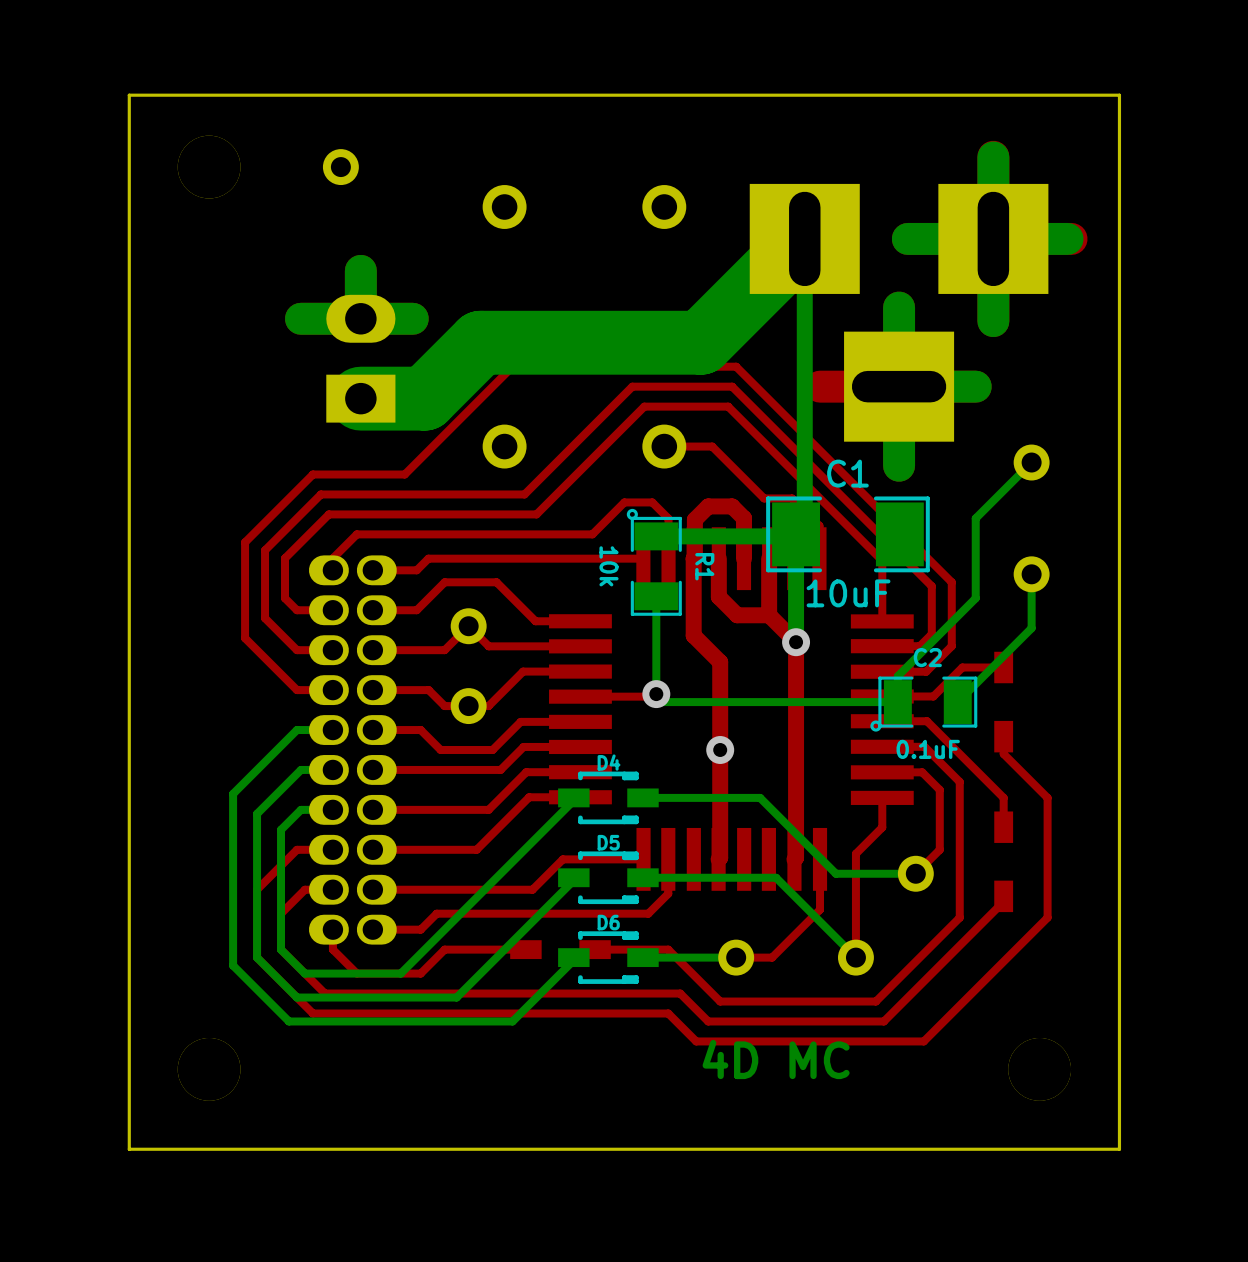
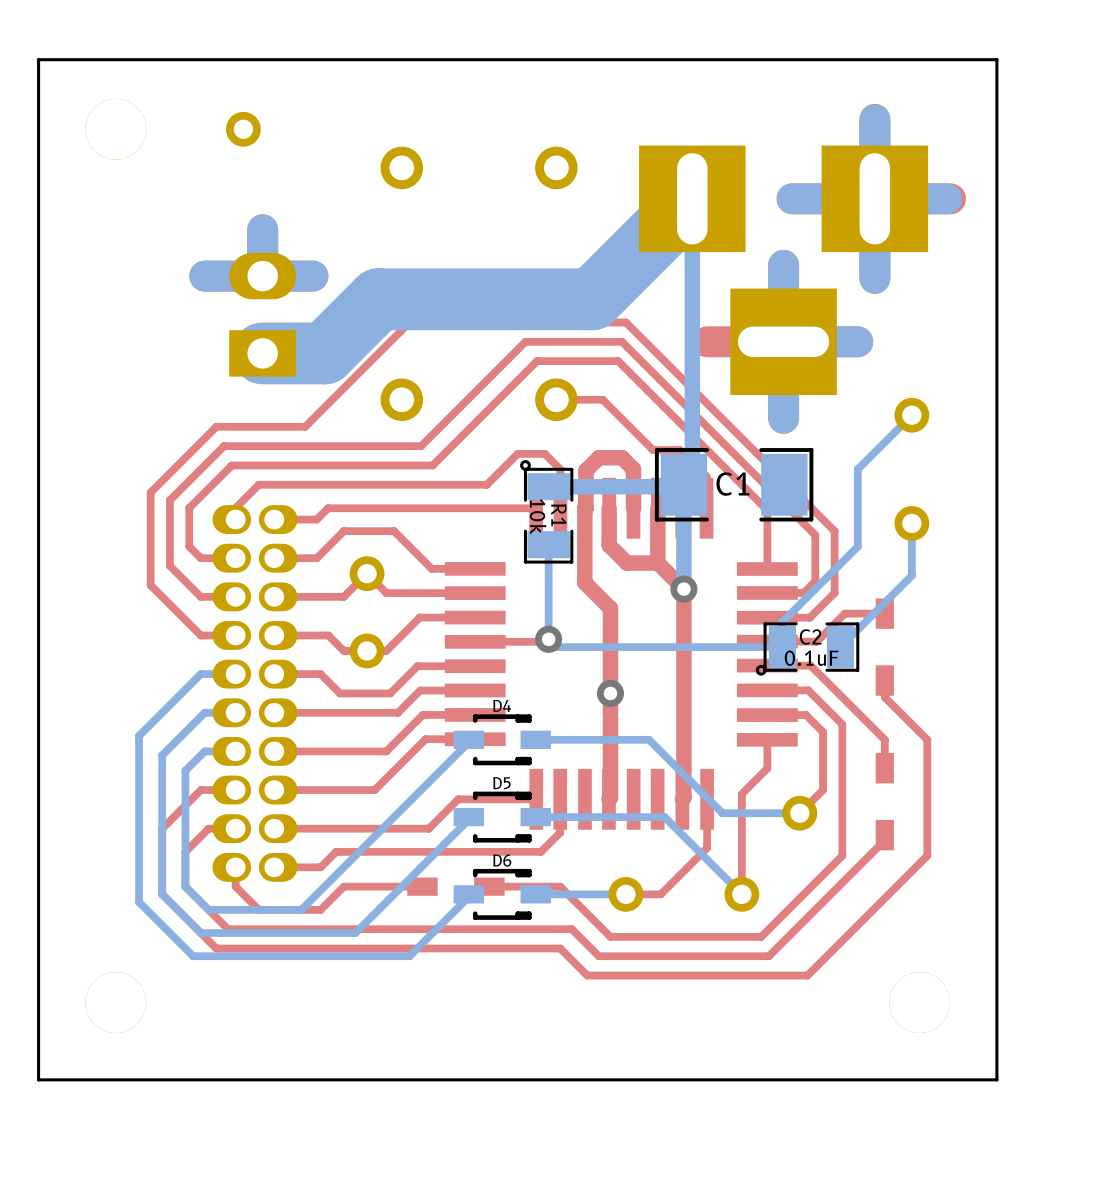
C1 name position: C1 (847, 473) -> C1 (732, 484)
R1 value position: 10k (608, 566) -> 10k (538, 516)
R1 name position: R1 (704, 566) -> R1 (558, 515)
C1 value: 10uF (848, 593) -> none
C2 name position: C2 (927, 657) -> C2 (810, 636)
C2 value position: 0.1uF (928, 749) -> 0.1uF (811, 658)
text: 4D MC (776, 1059) -> none

